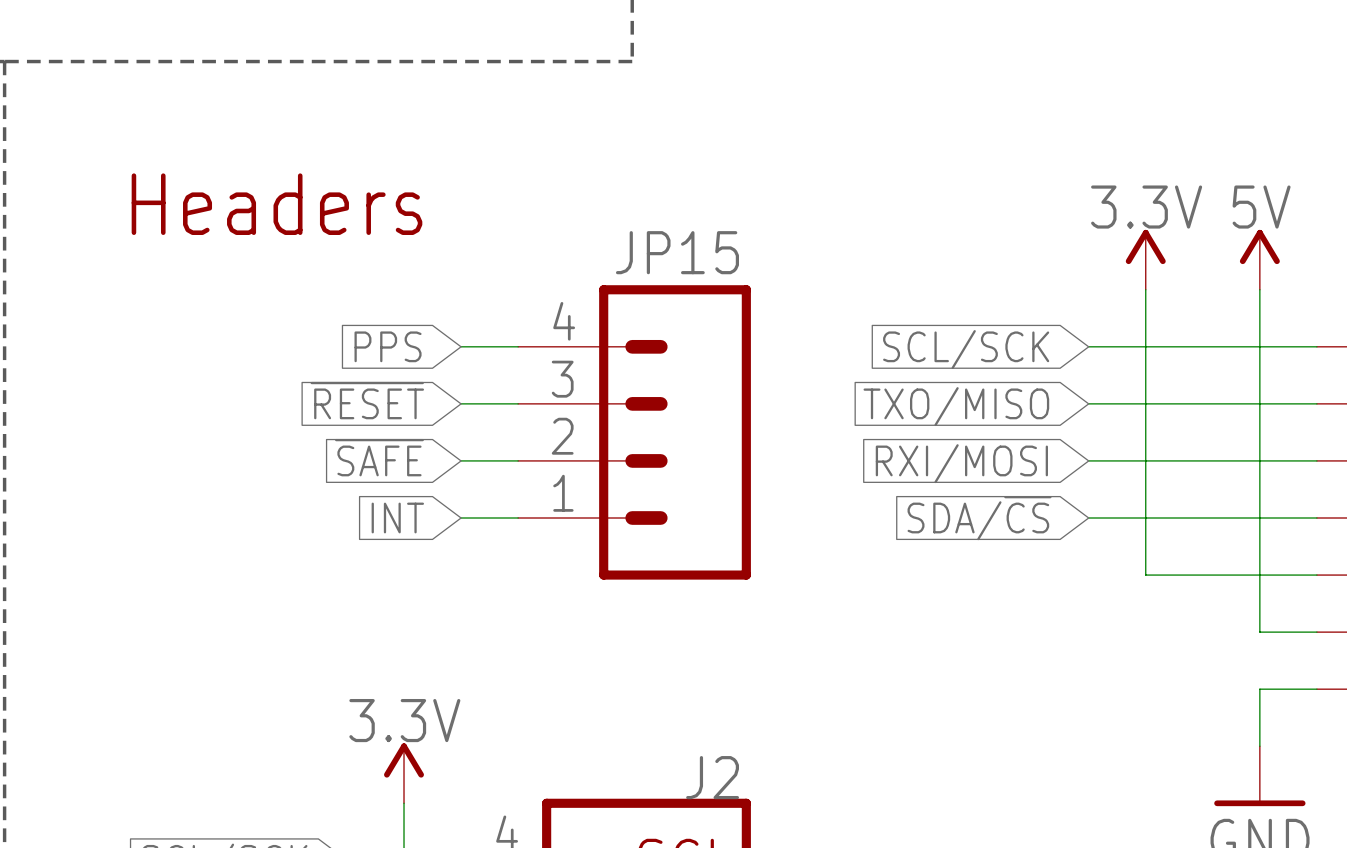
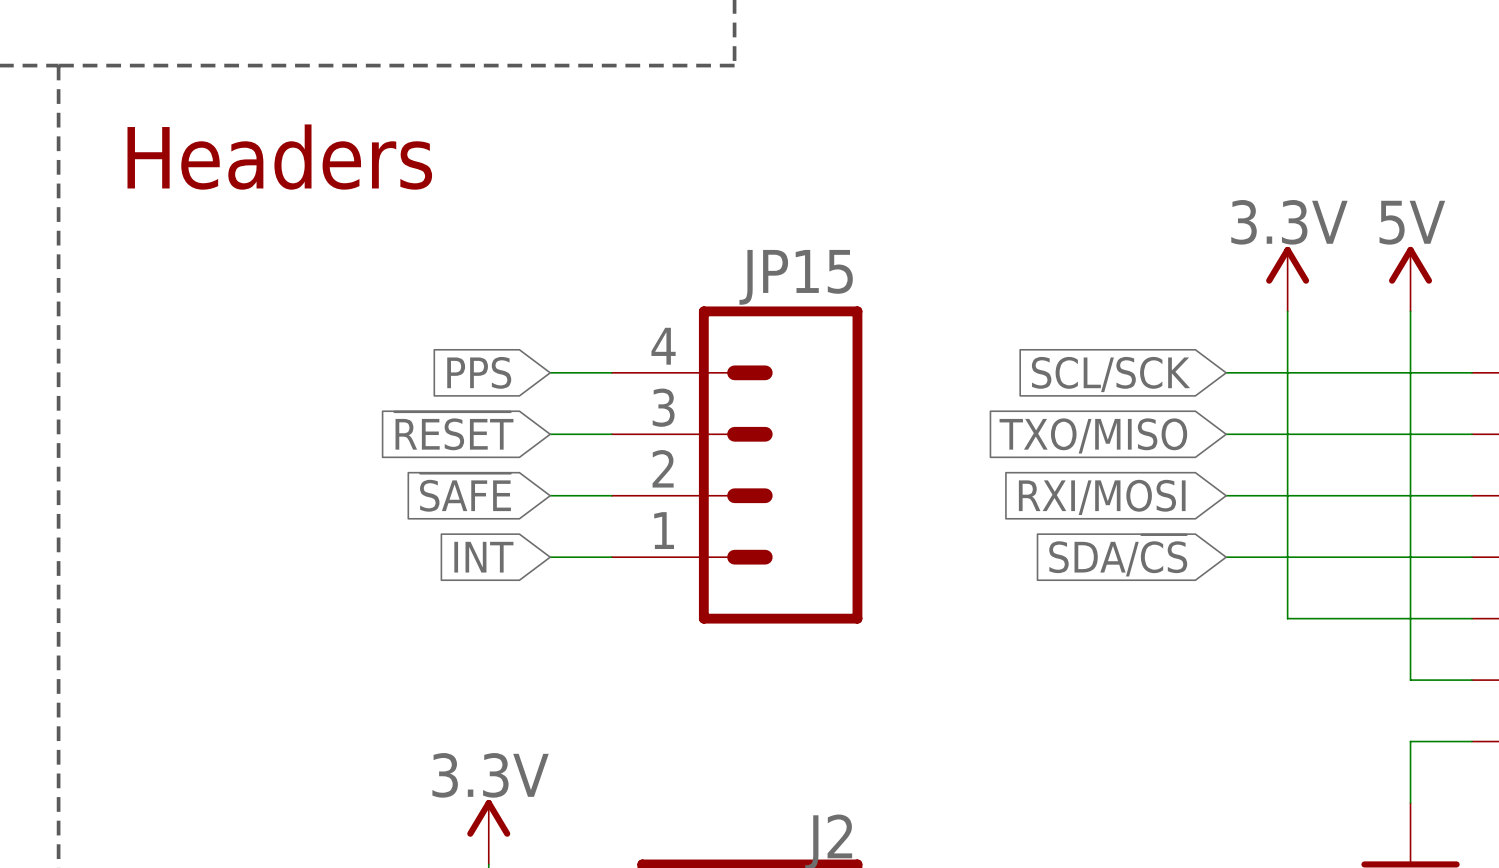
text position: Headers (276, 204) -> Headers (279, 157)

